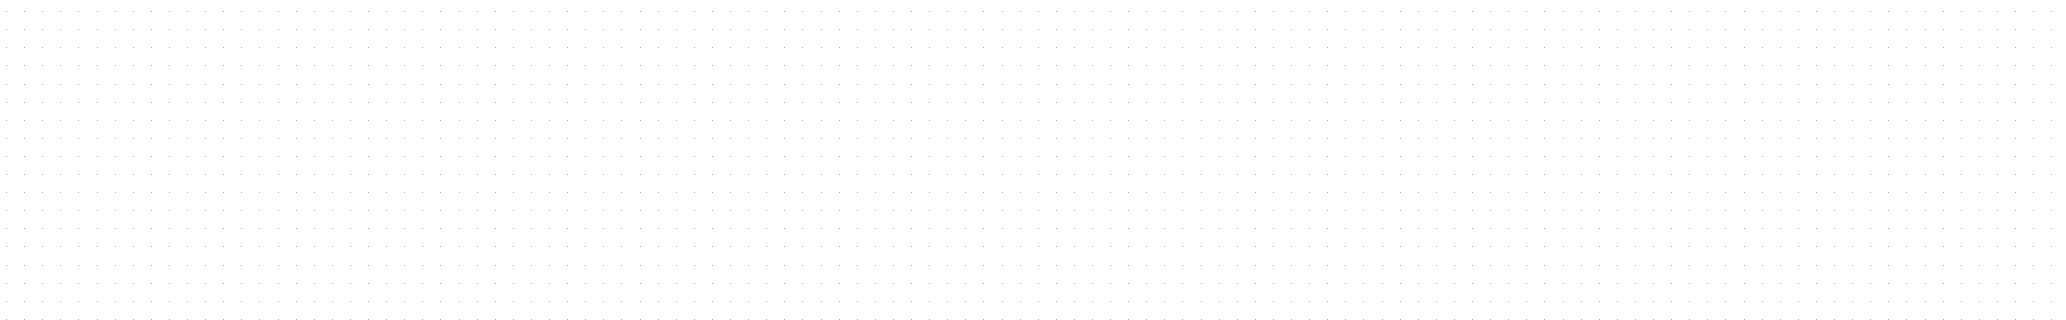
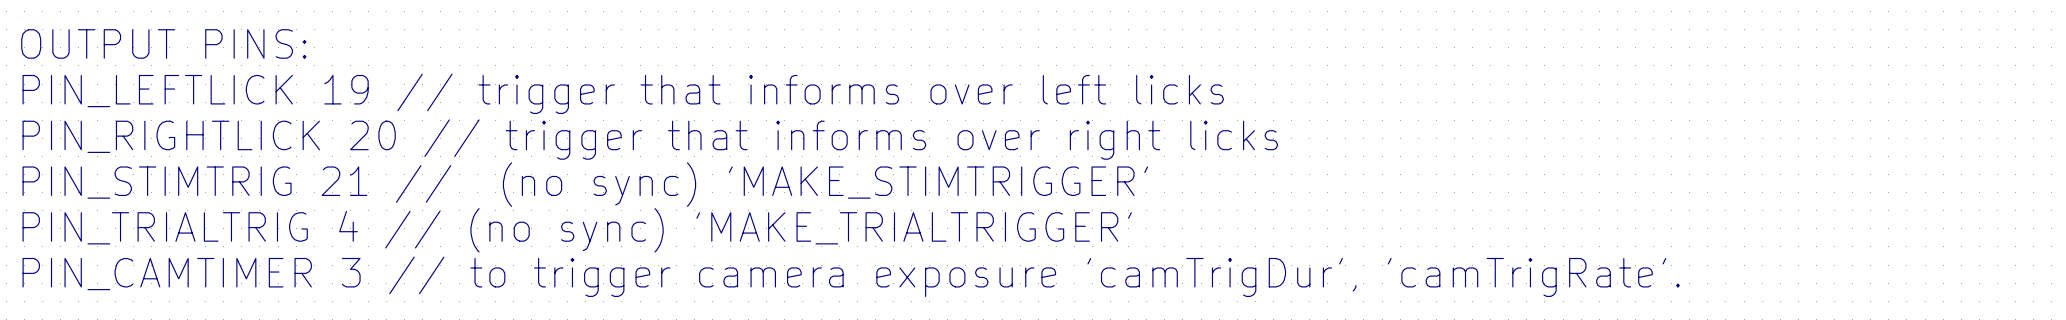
text: none -> OUTPUT PINS: (163, 43)
text: none -> PIN_LEFTLICK 19 // trigger that informs over left licks (623, 93)
text: none -> PIN_RIGHTLICK 20 // trigger that informs over right licks (650, 139)
text: none -> PIN_STIMTRIG 21 // (no sync) 'MAKE_STIMTRIGGER' (585, 184)
text: none -> PIN_TRIALTRIG 4 // (no sync) 'MAKE_TRIALTRIGGER' (577, 230)
text: none -> PIN_CAMTIMER 3 // to trigger camera exposure 'camTrigDur', 'camTrigRate'. (851, 276)

